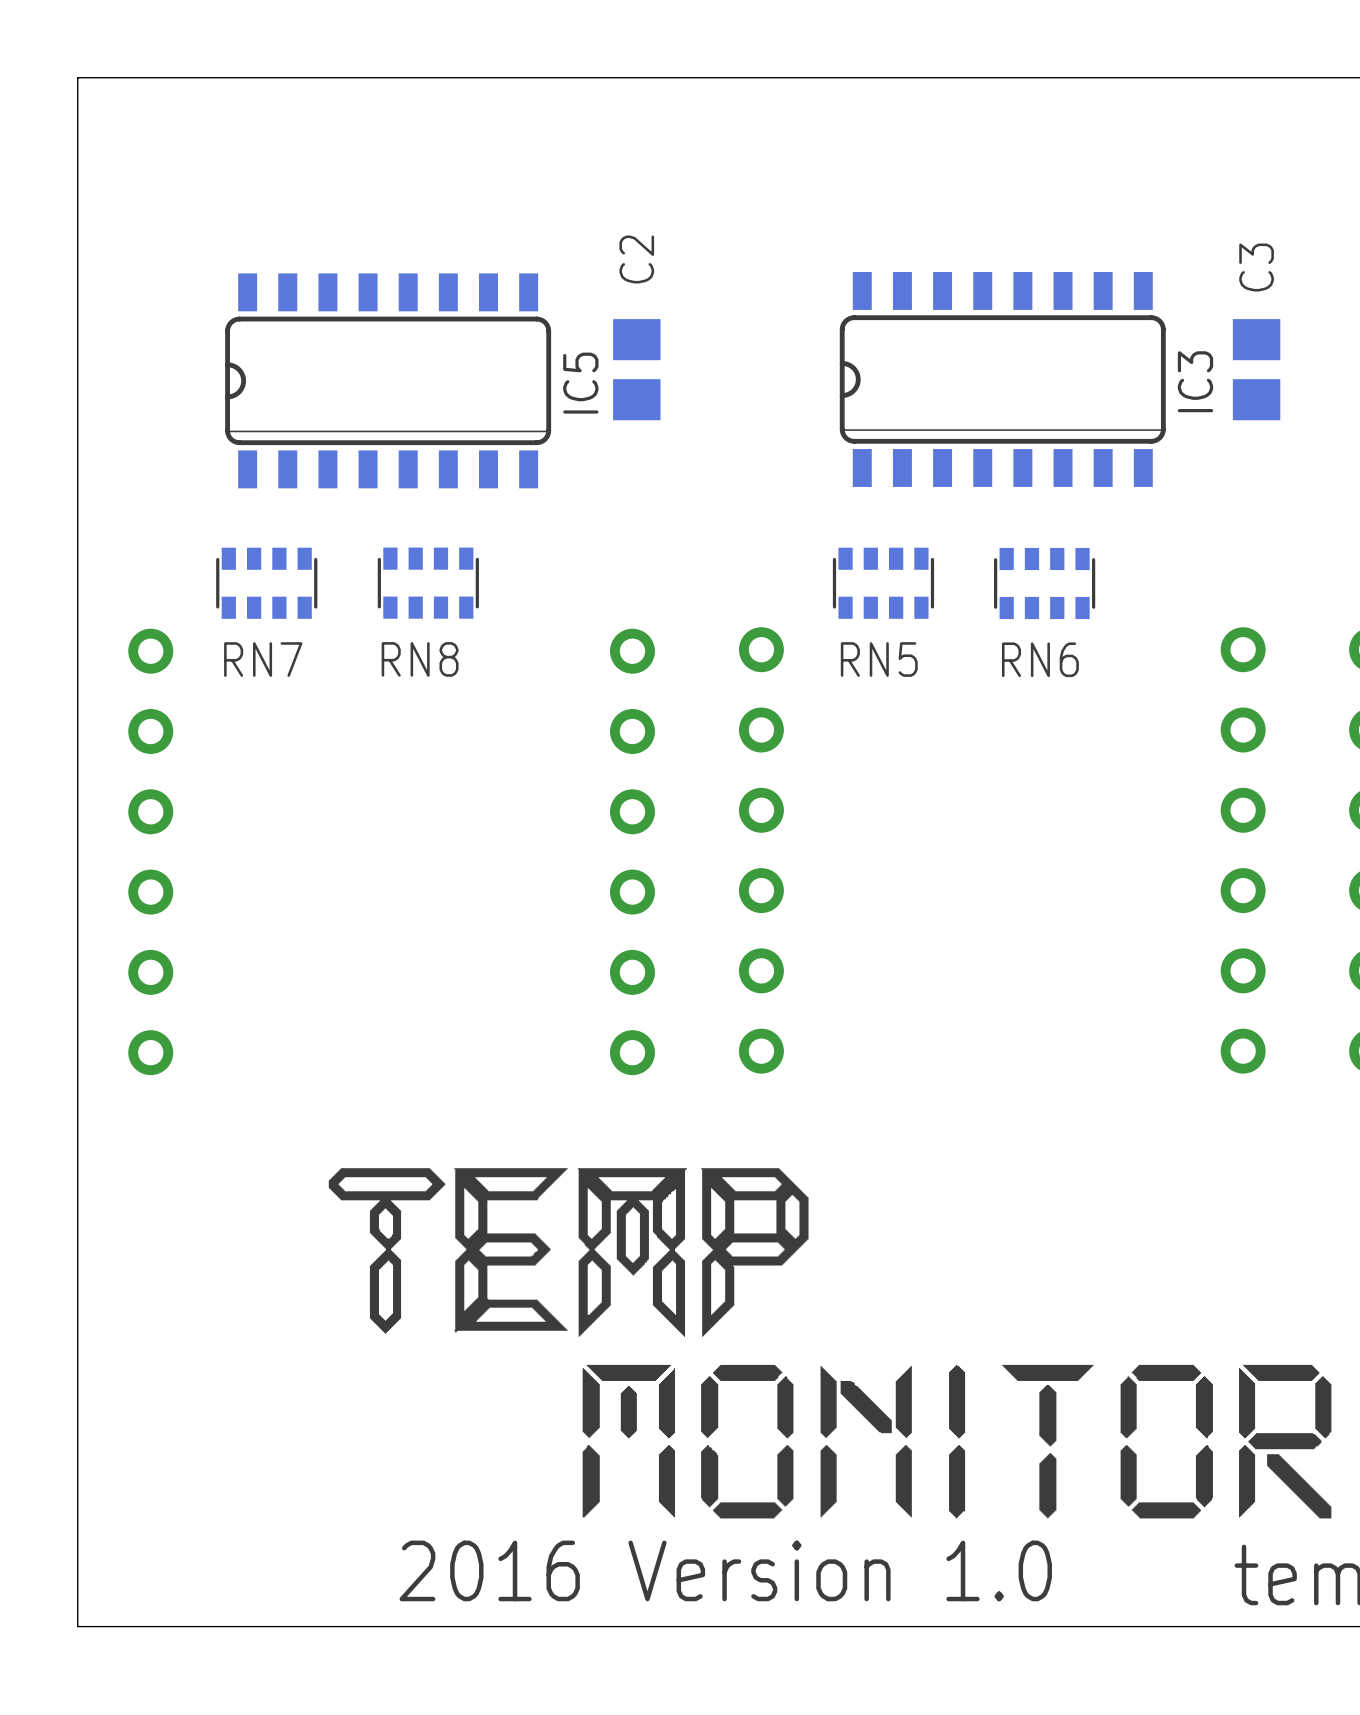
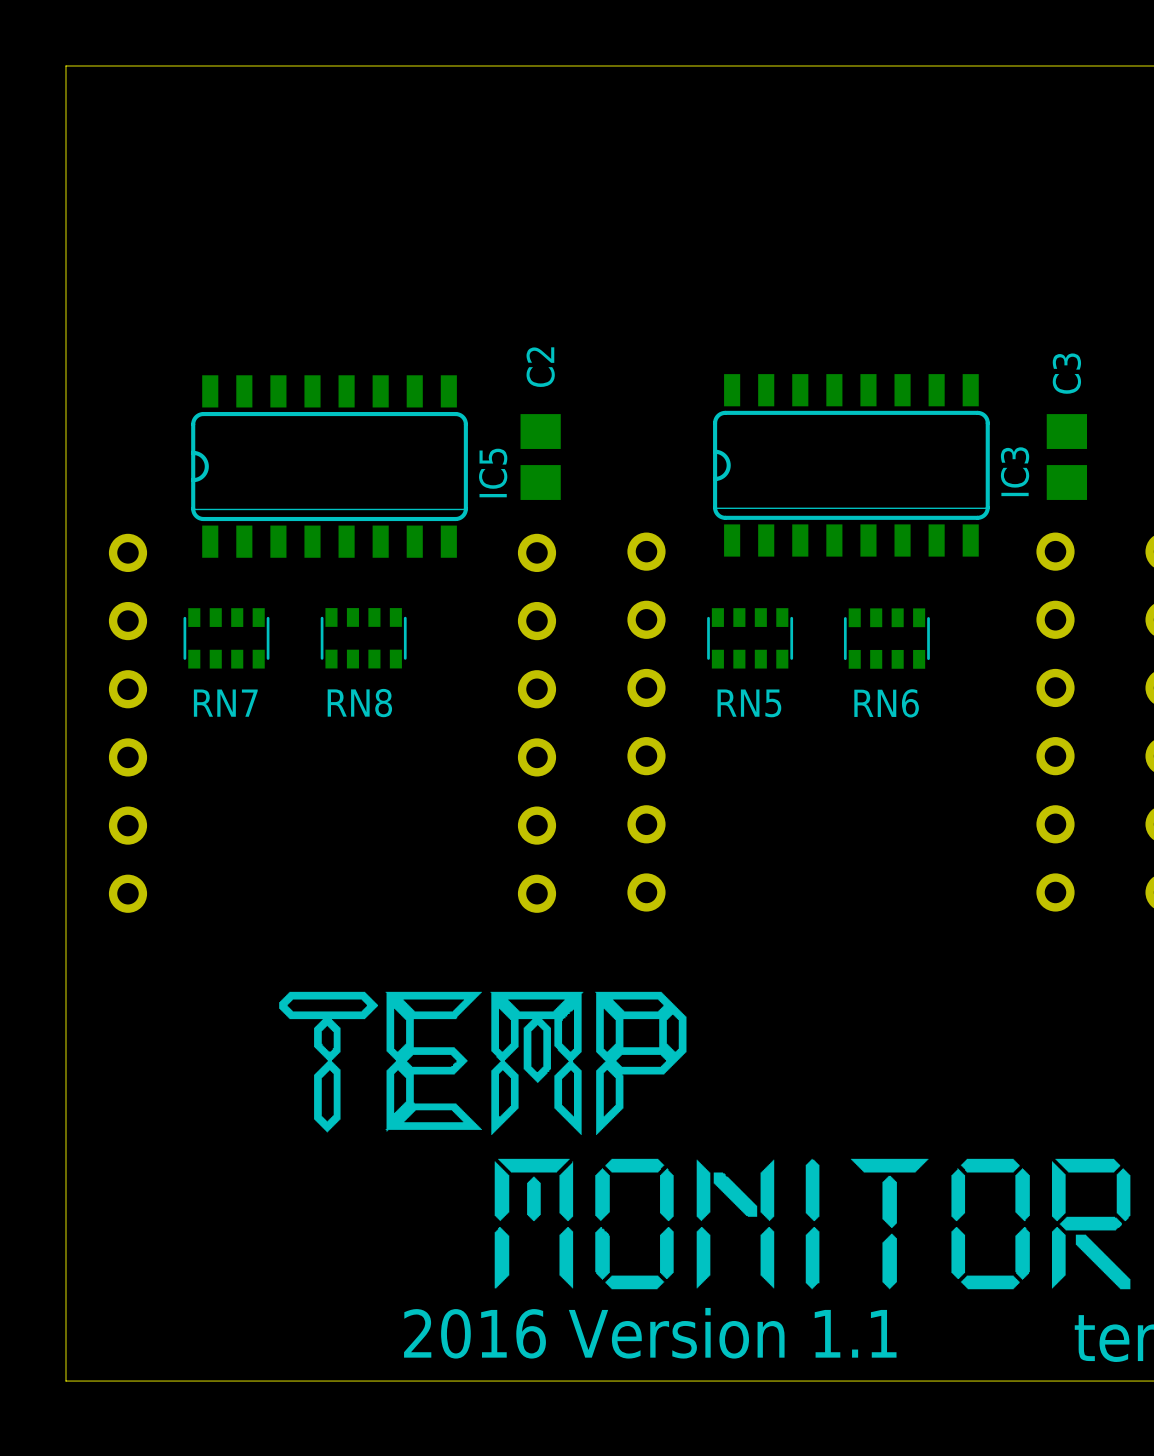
C2 position: (636, 369) -> (540, 457)
C3 position: (1256, 369) -> (1066, 457)
IC3 position: (1002, 379) -> (851, 465)
IC5 position: (388, 380) -> (329, 466)
RN7 position: (266, 583) -> (226, 638)
RN8 position: (428, 583) -> (363, 638)
RN5 position: (883, 583) -> (750, 638)
RN6 position: (1044, 583) -> (886, 638)
text: 2016 Version 1.0 (725, 1570) -> 2016 Version 1.1 (650, 1333)

